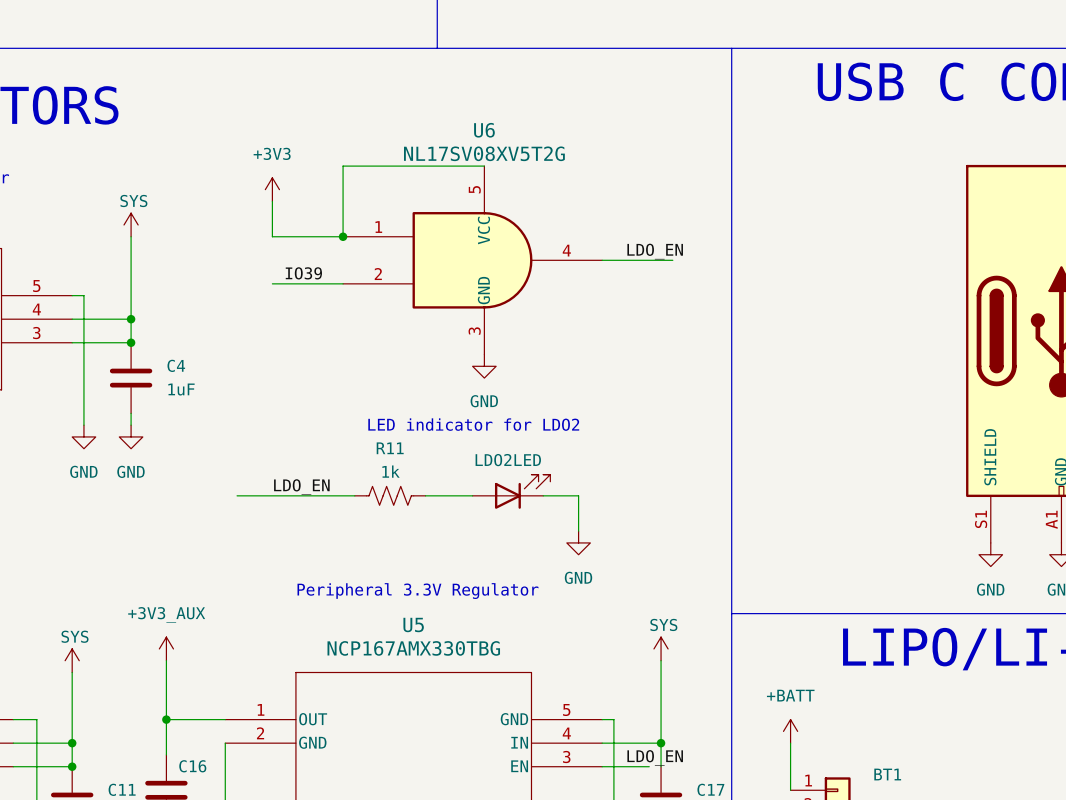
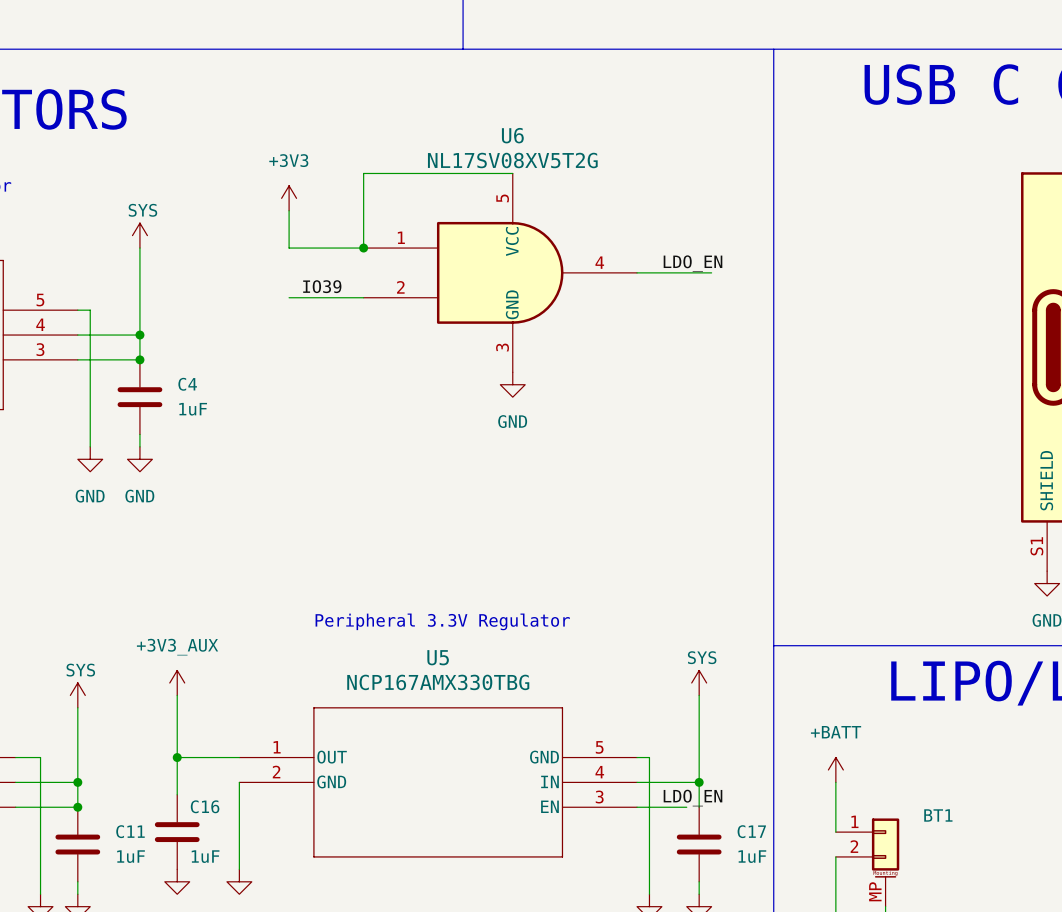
text: LED indicator for LDO2 (473, 424) -> none
label: LDO_EN (301, 487) -> none
part: LDO2LED (511, 491) -> none
wire: (237, 495) (354, 495) -> none
R11: 1k (390, 495) -> none
wire: (425, 495) (472, 495) -> none
wire: (543, 495) (578, 495) (578, 531) -> none
power symbol: GND (578, 542) -> none

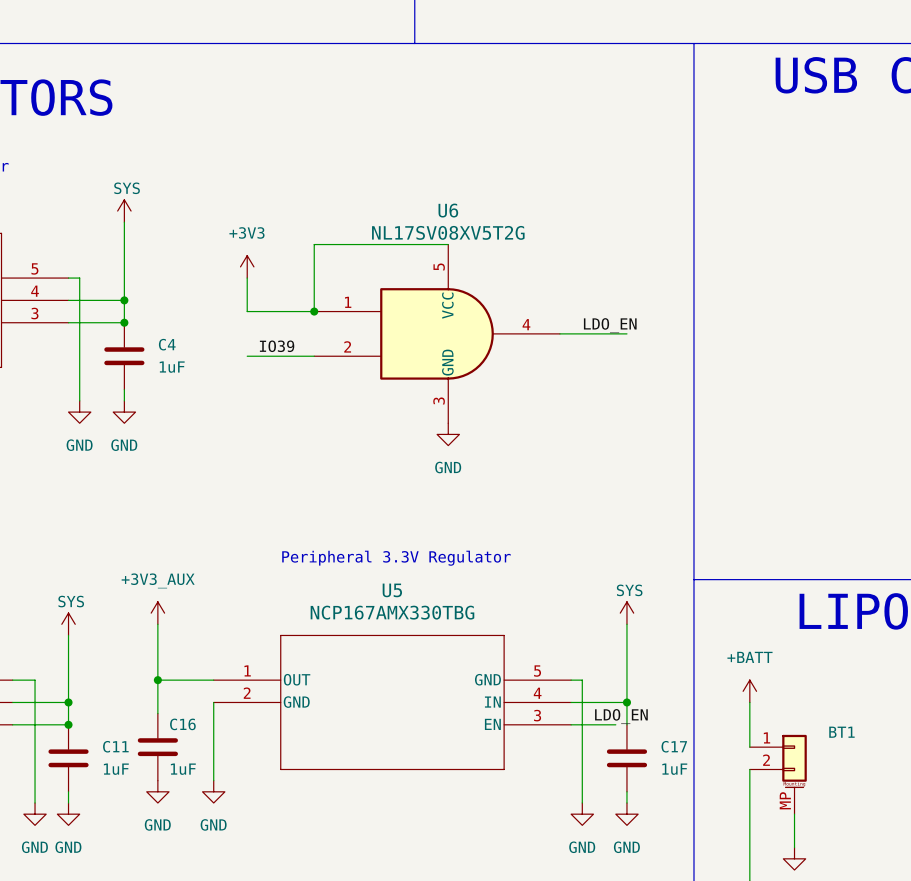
wire: (512, 173) (363, 173) (363, 248) (289, 248) (289, 210) -> (448, 244) (314, 244) (314, 311) (247, 311) (247, 278)
power symbol position: +3V3 (289, 198) -> +3V3 (247, 266)
junction: (363, 248) -> none
label position: LDO_EN (692, 263) -> LDO_EN (610, 325)
U6 position: (500, 272) -> (437, 333)
wire: (637, 272) (711, 272) -> (559, 333) (626, 333)
label position: IO39 (322, 286) -> IO39 (277, 346)
wire: (289, 297) (363, 297) -> (247, 356) (314, 356)
junction: none -> (314, 311)
power symbol position: GND (512, 384) -> GND (448, 434)

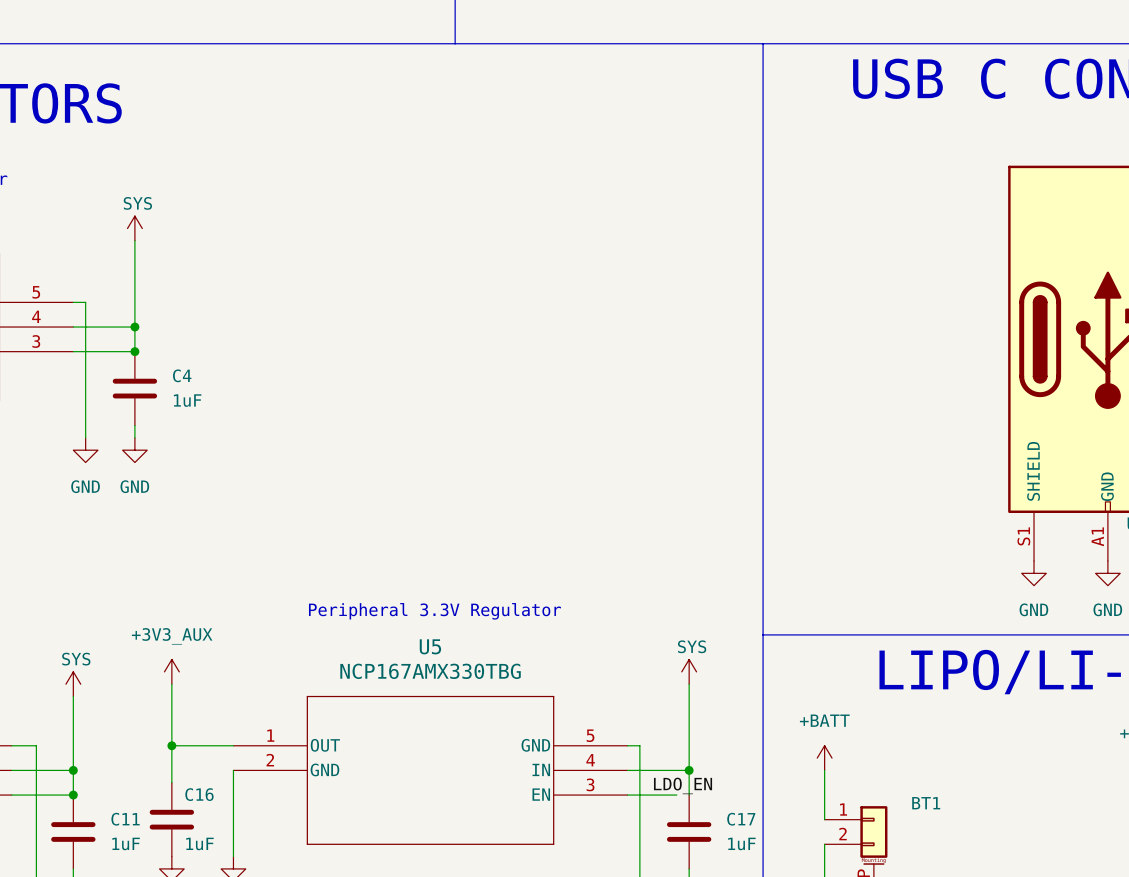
wire: (448, 244) (314, 244) (314, 311) (247, 311) (247, 278) -> none
power symbol: +3V3 (247, 266) -> none
junction: (314, 311) -> none
label: LDO_EN (610, 325) -> none
U6: NL17SV08XV5T2G (437, 333) -> none
wire: (559, 333) (626, 333) -> none
label: IO39 (277, 346) -> none
wire: (247, 356) (314, 356) -> none
power symbol: GND (448, 434) -> none

